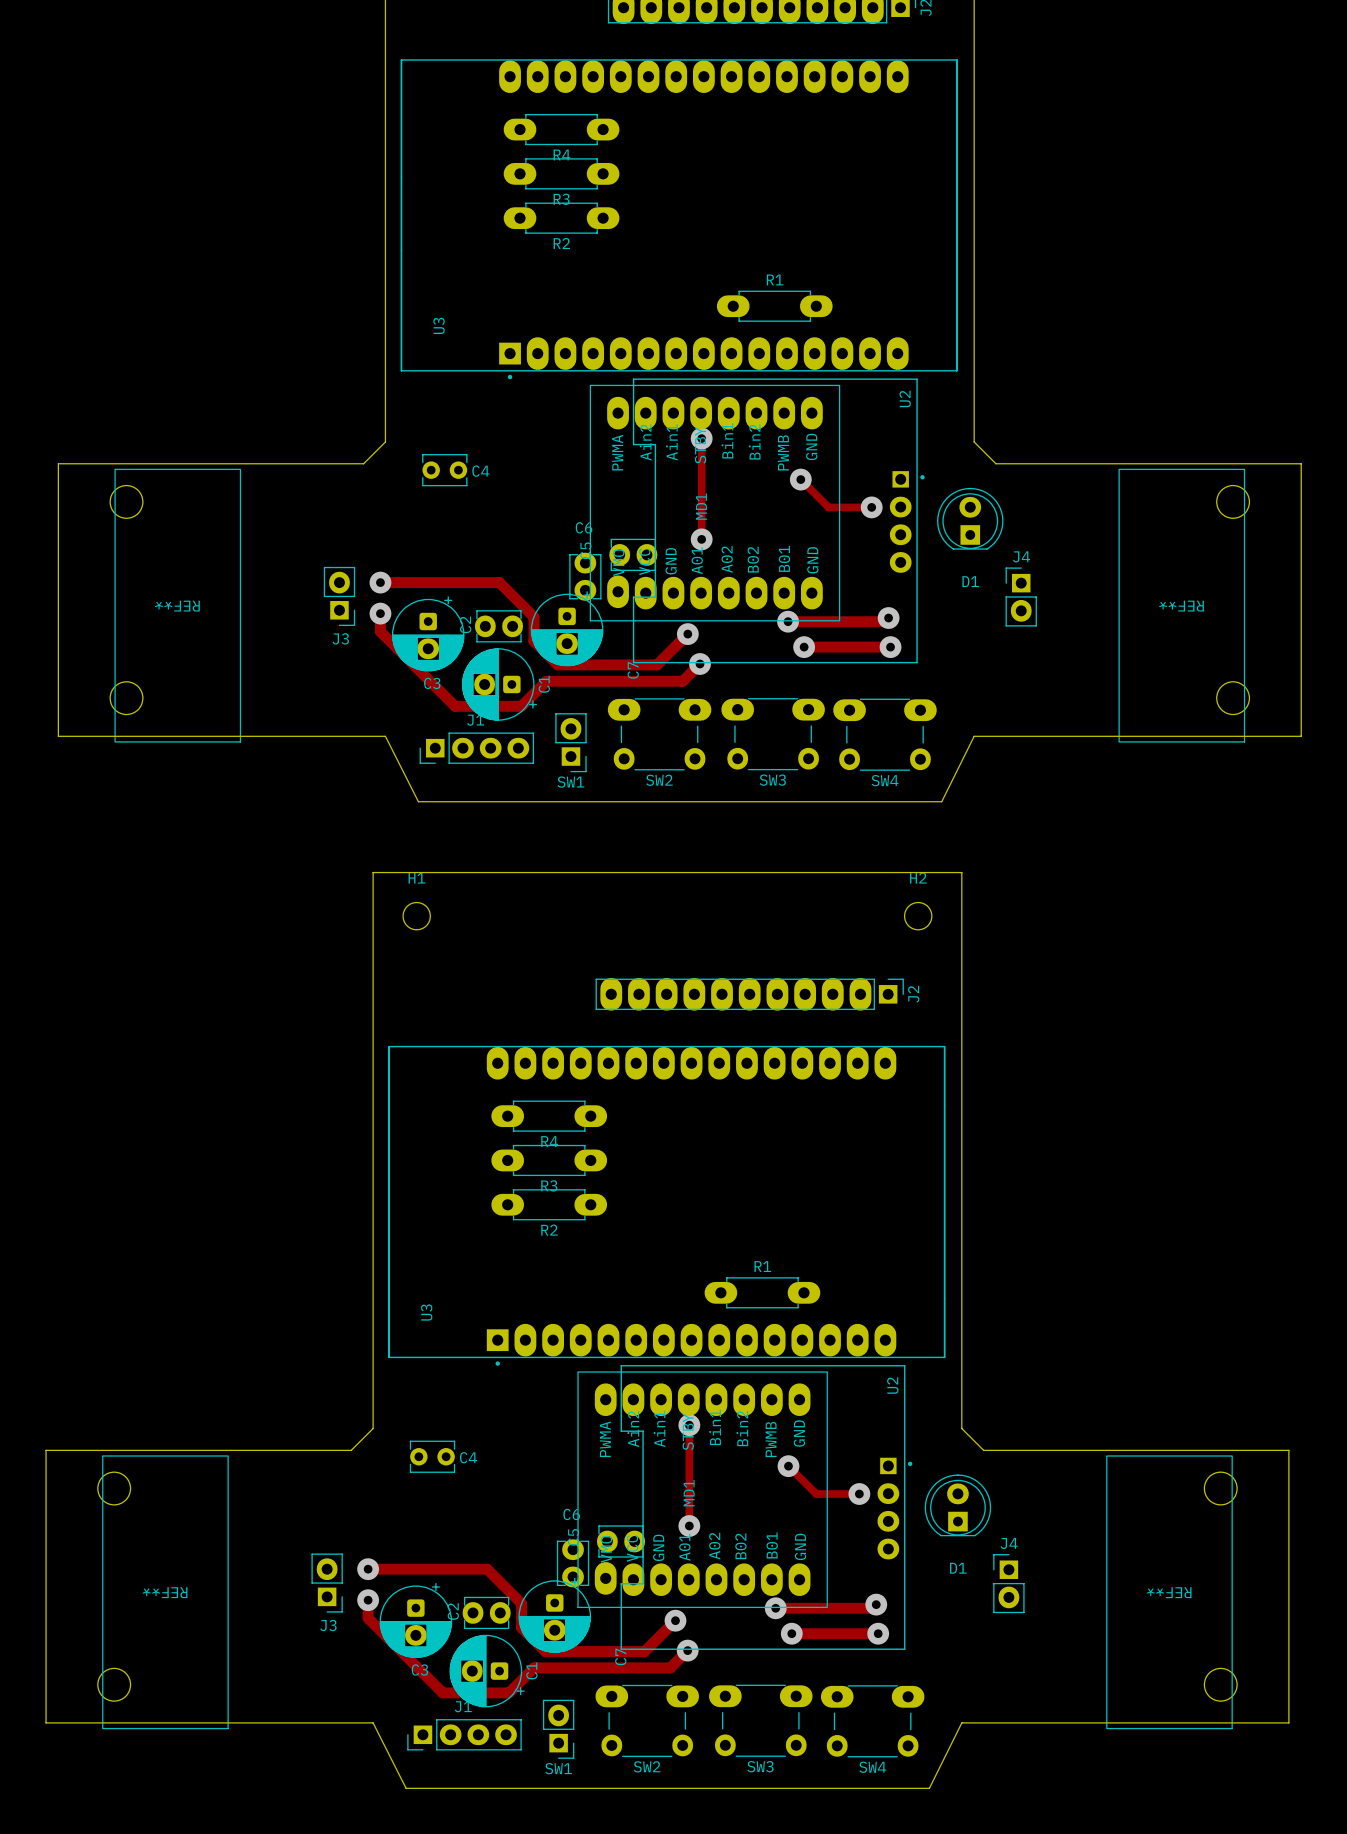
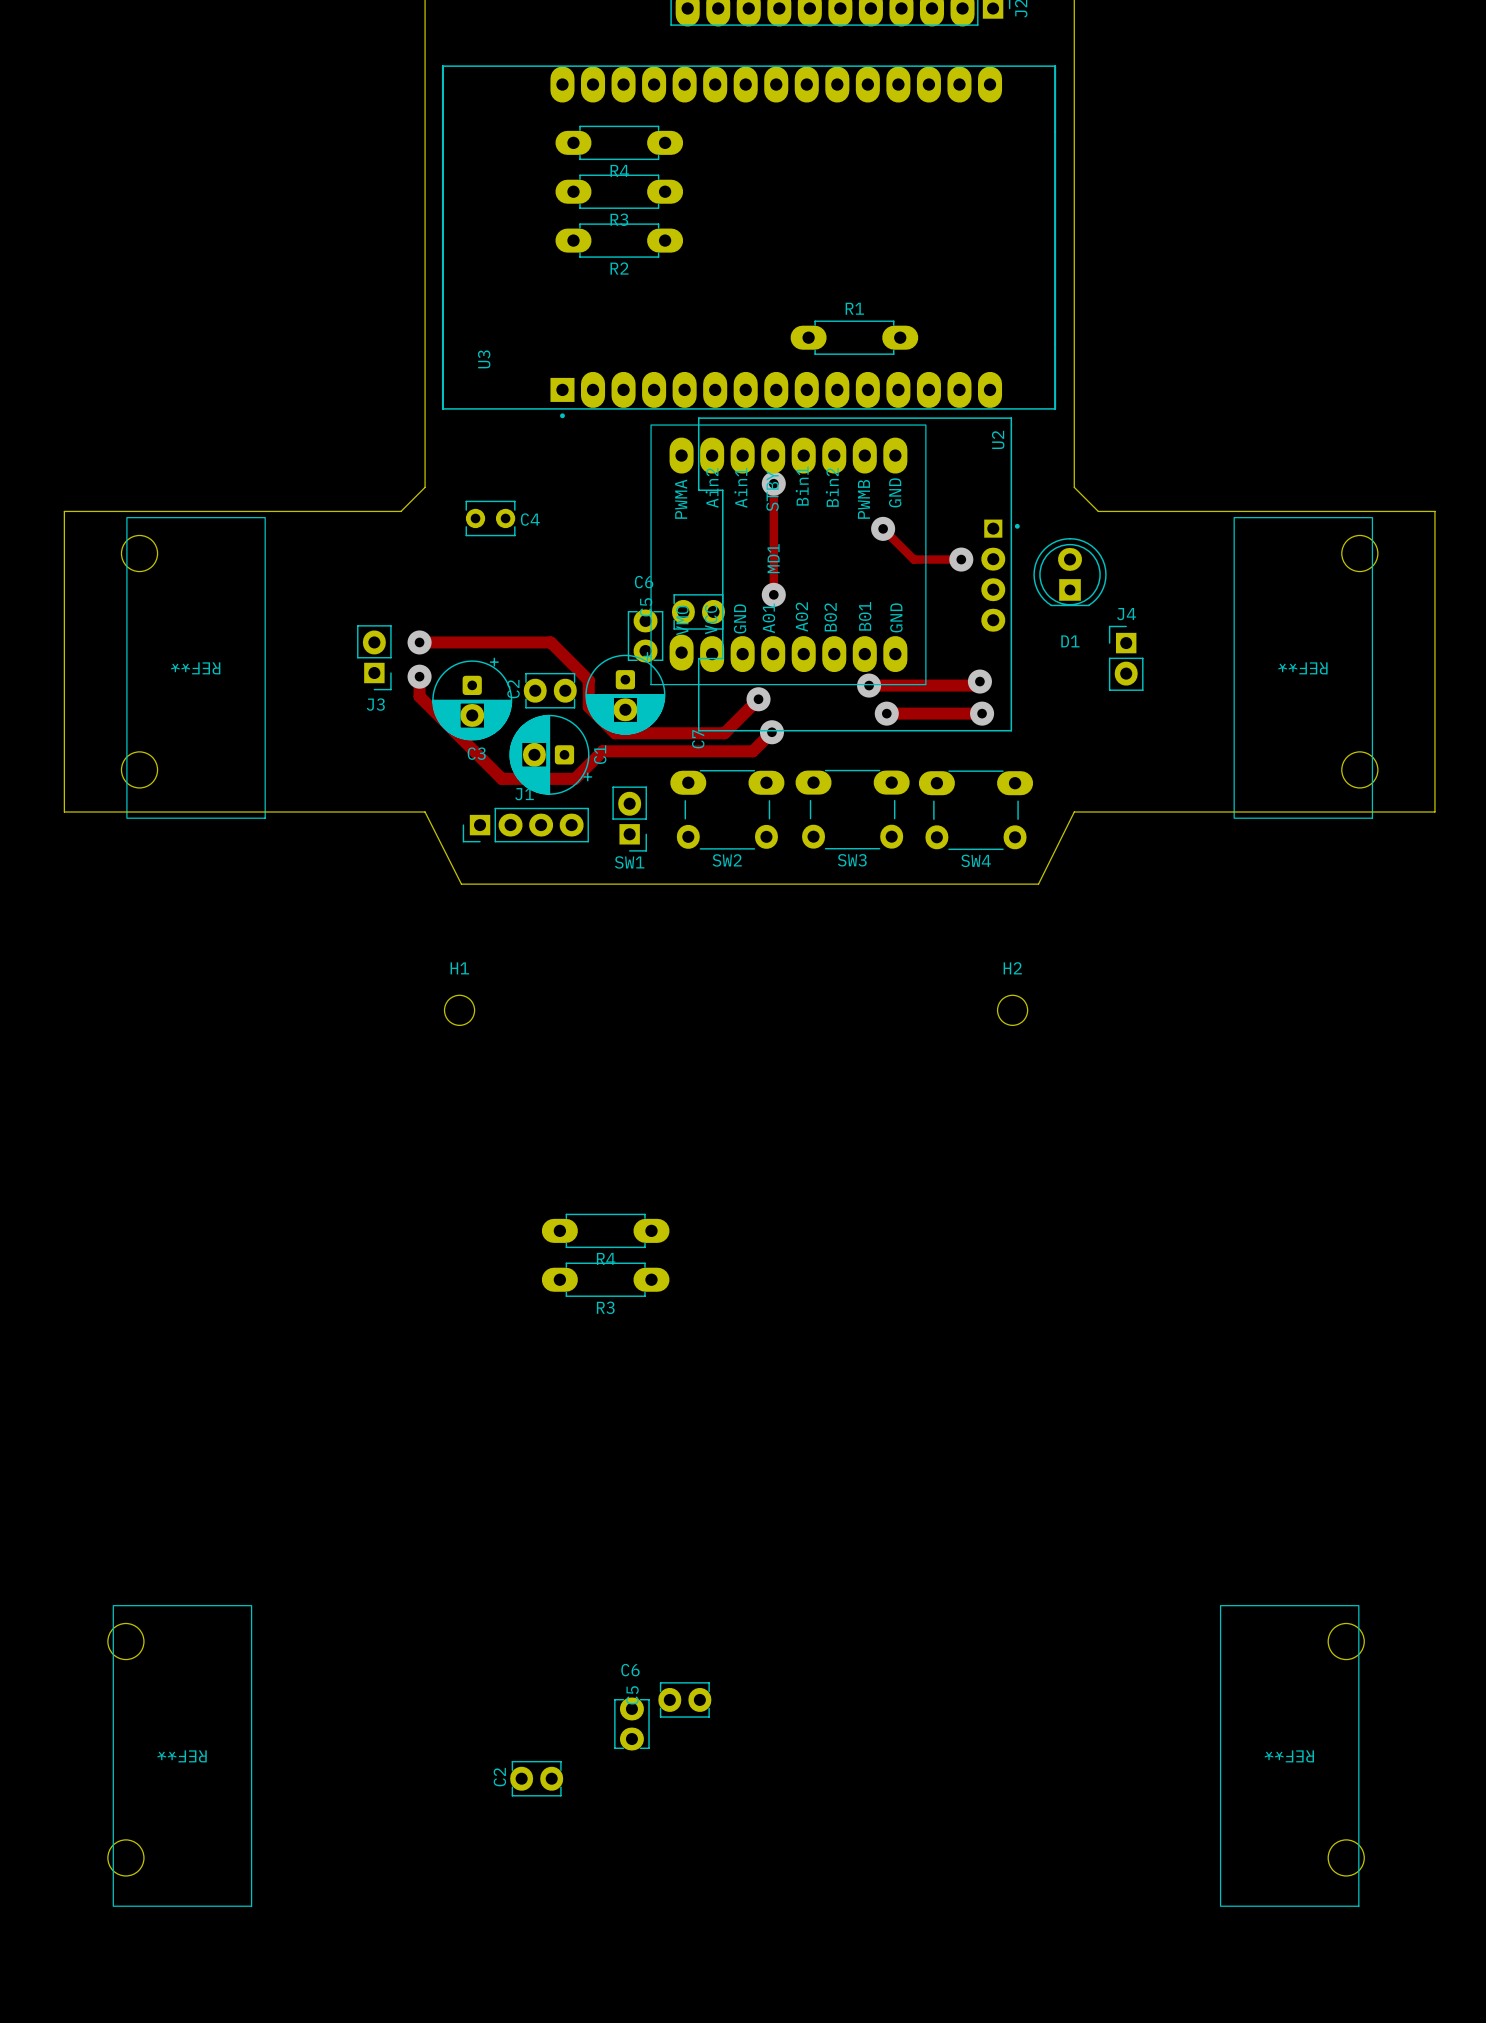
board edge: (373, 872) (373, 1428) (351, 1450) (46, 1450) (46, 1722) (373, 1722) (406, 1788) (929, 1788) (961, 1722) (1288, 1722) (1288, 1450) (983, 1450) (961, 1428) (961, 872) (373, 872) -> none
J2: (749, 994) -> none
R2: (549, 1204) -> none
U3: (666, 1205) -> none
R1: (762, 1292) -> none
track: (689, 1425) (689, 1525) -> none
via: (689, 1425) -> none
C4: (432, 1456) -> none
track: (788, 1466) (816, 1494) (859, 1494) -> none
via: (788, 1466) -> none
MD1: (702, 1489) -> none
via: (859, 1494) -> none
D1: (957, 1505) -> none
U2: (766, 1507) -> none
via: (689, 1525) -> none
track: (368, 1569) (487, 1569) (521, 1603) (521, 1627) (545, 1651) (644, 1651) (675, 1620) -> none
via: (368, 1569) -> none
J3: (327, 1583) -> none
J4: (1008, 1583) -> none
track: (368, 1600) (368, 1618) (442, 1692) (509, 1692) (534, 1667) (670, 1667) (687, 1650) -> none
via: (368, 1600) -> none
track: (876, 1604) (872, 1608) (775, 1608) -> none
via: (876, 1604) -> none
via: (775, 1608) -> none
C7: (554, 1615) -> none
C3: (415, 1620) -> none
via: (675, 1620) -> none
track: (791, 1633) (878, 1633) -> none
via: (791, 1633) -> none
via: (878, 1633) -> none
via: (687, 1650) -> none
C1: (487, 1671) -> none
SW2: (647, 1720) -> none
SW3: (760, 1720) -> none
SW4: (872, 1721) -> none
SW1: (558, 1729) -> none
J1: (464, 1734) -> none

